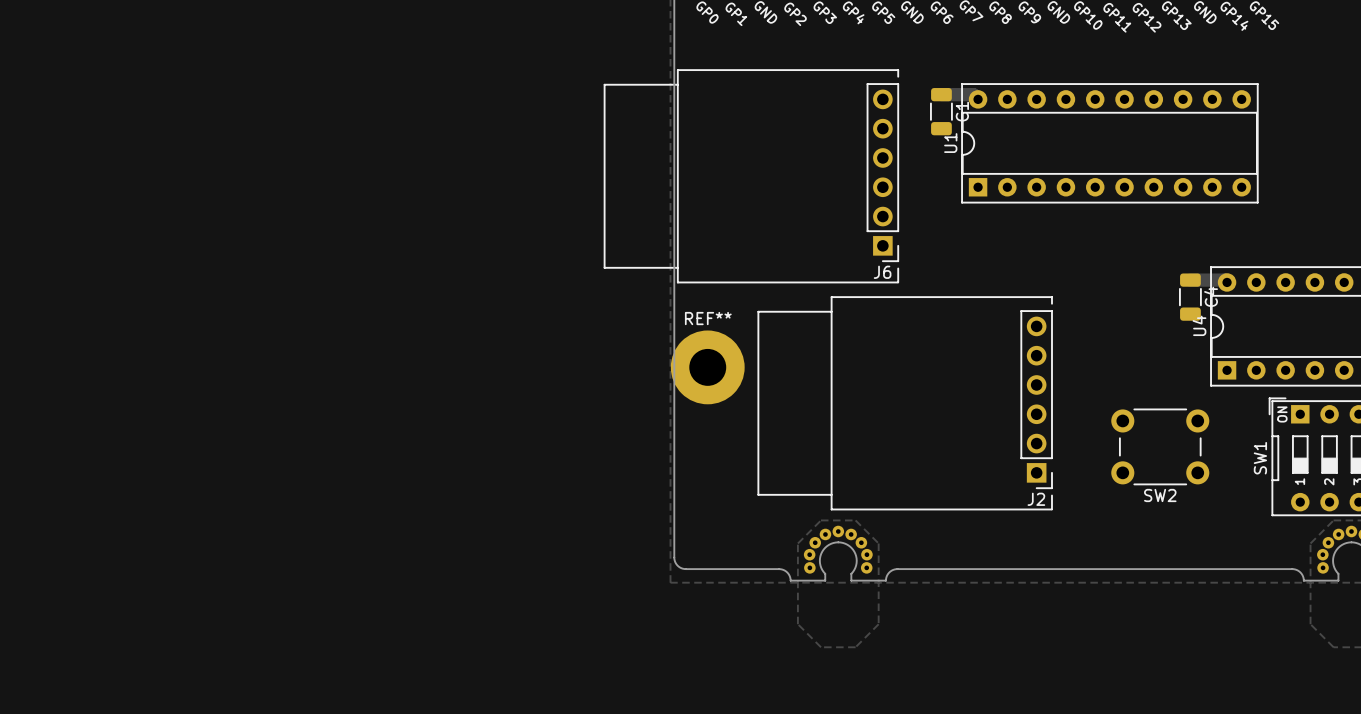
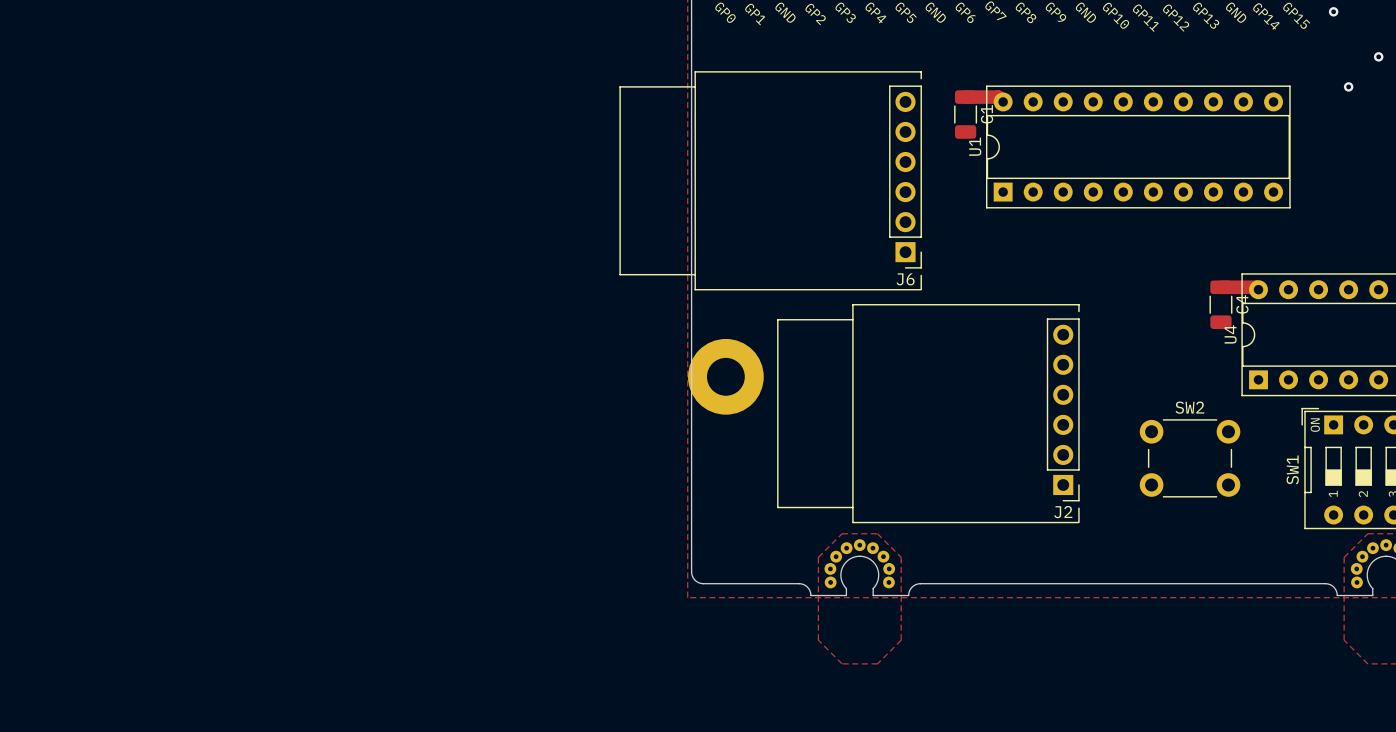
via: none -> (1333, 11)
via: none -> (1378, 56)
via: none -> (1348, 86)
REF** name: REF** (708, 318) -> none
SW2 name position: SW2 (1160, 495) -> SW2 (1189, 407)

